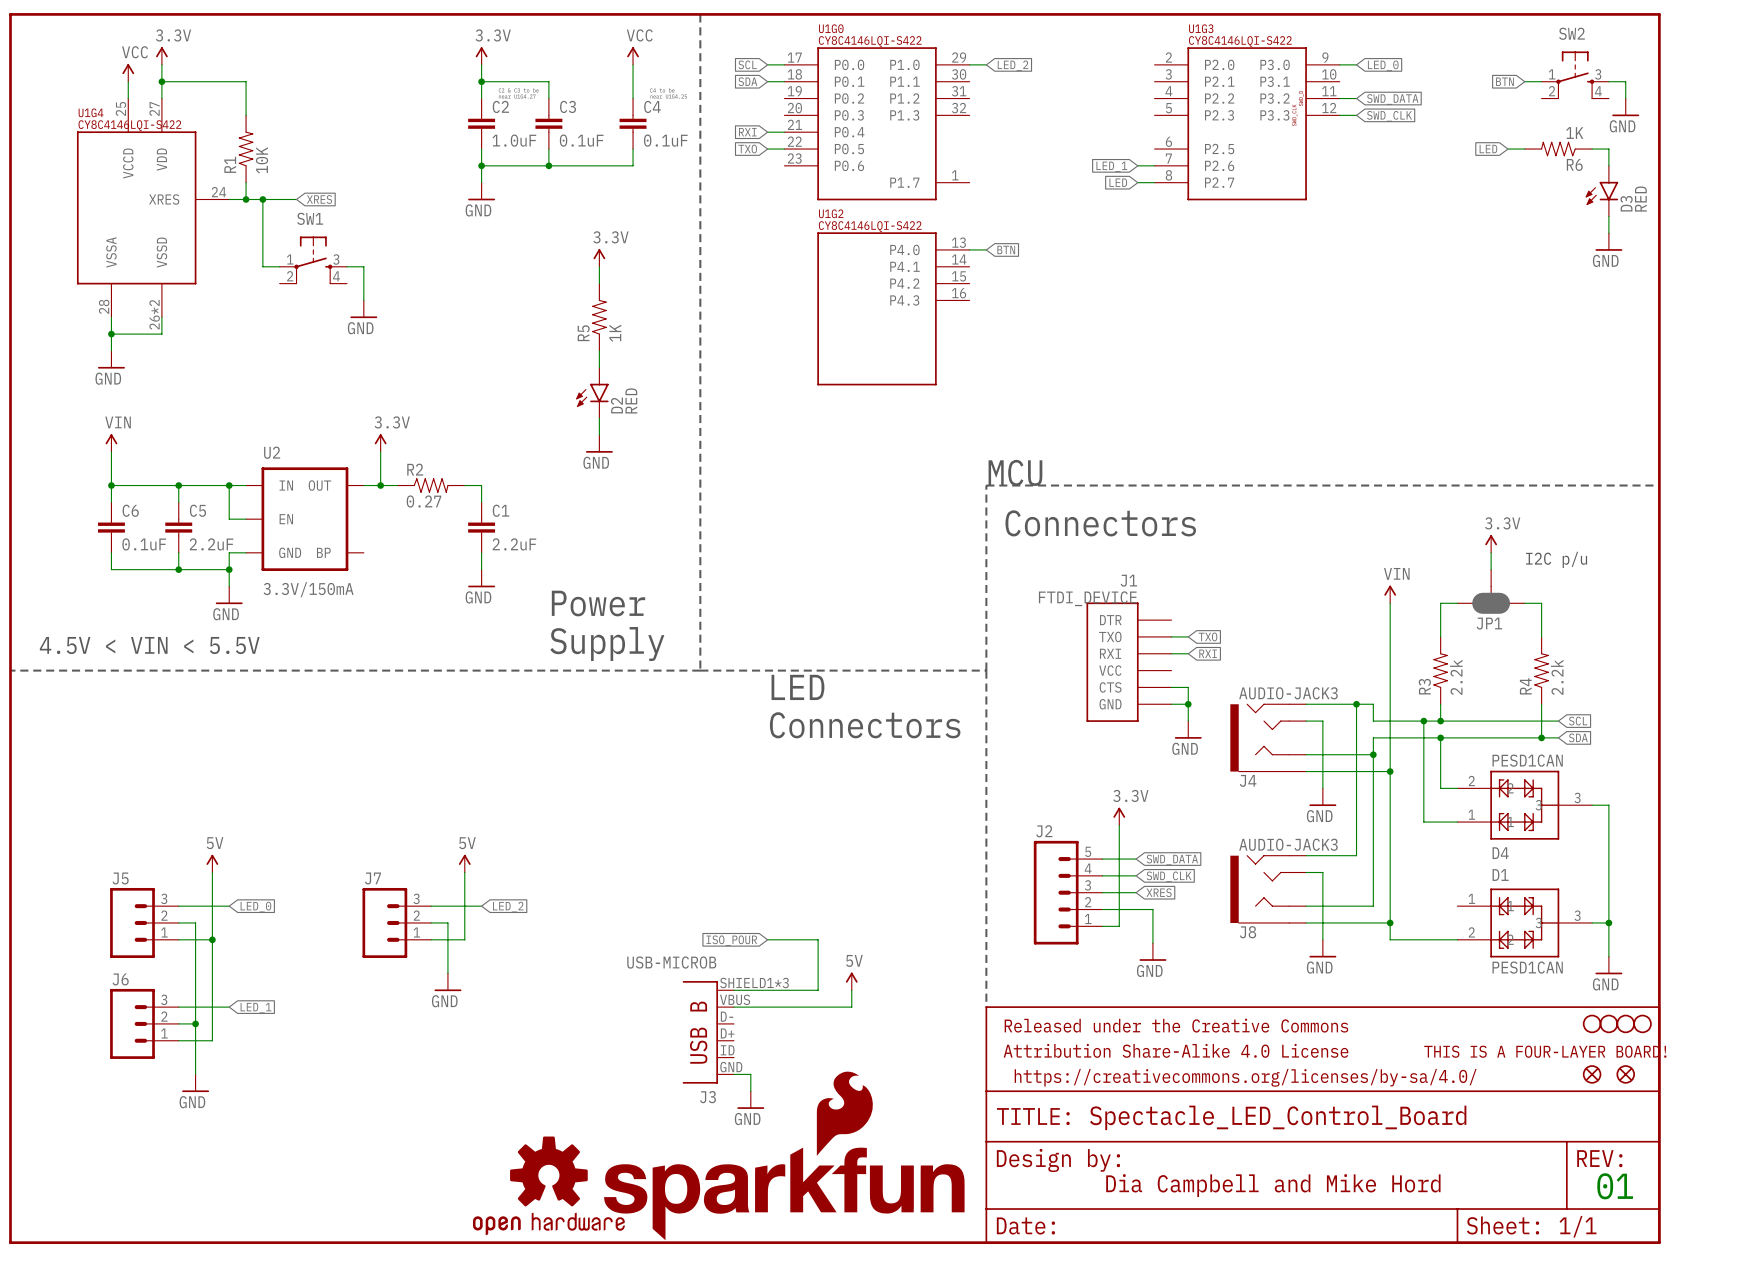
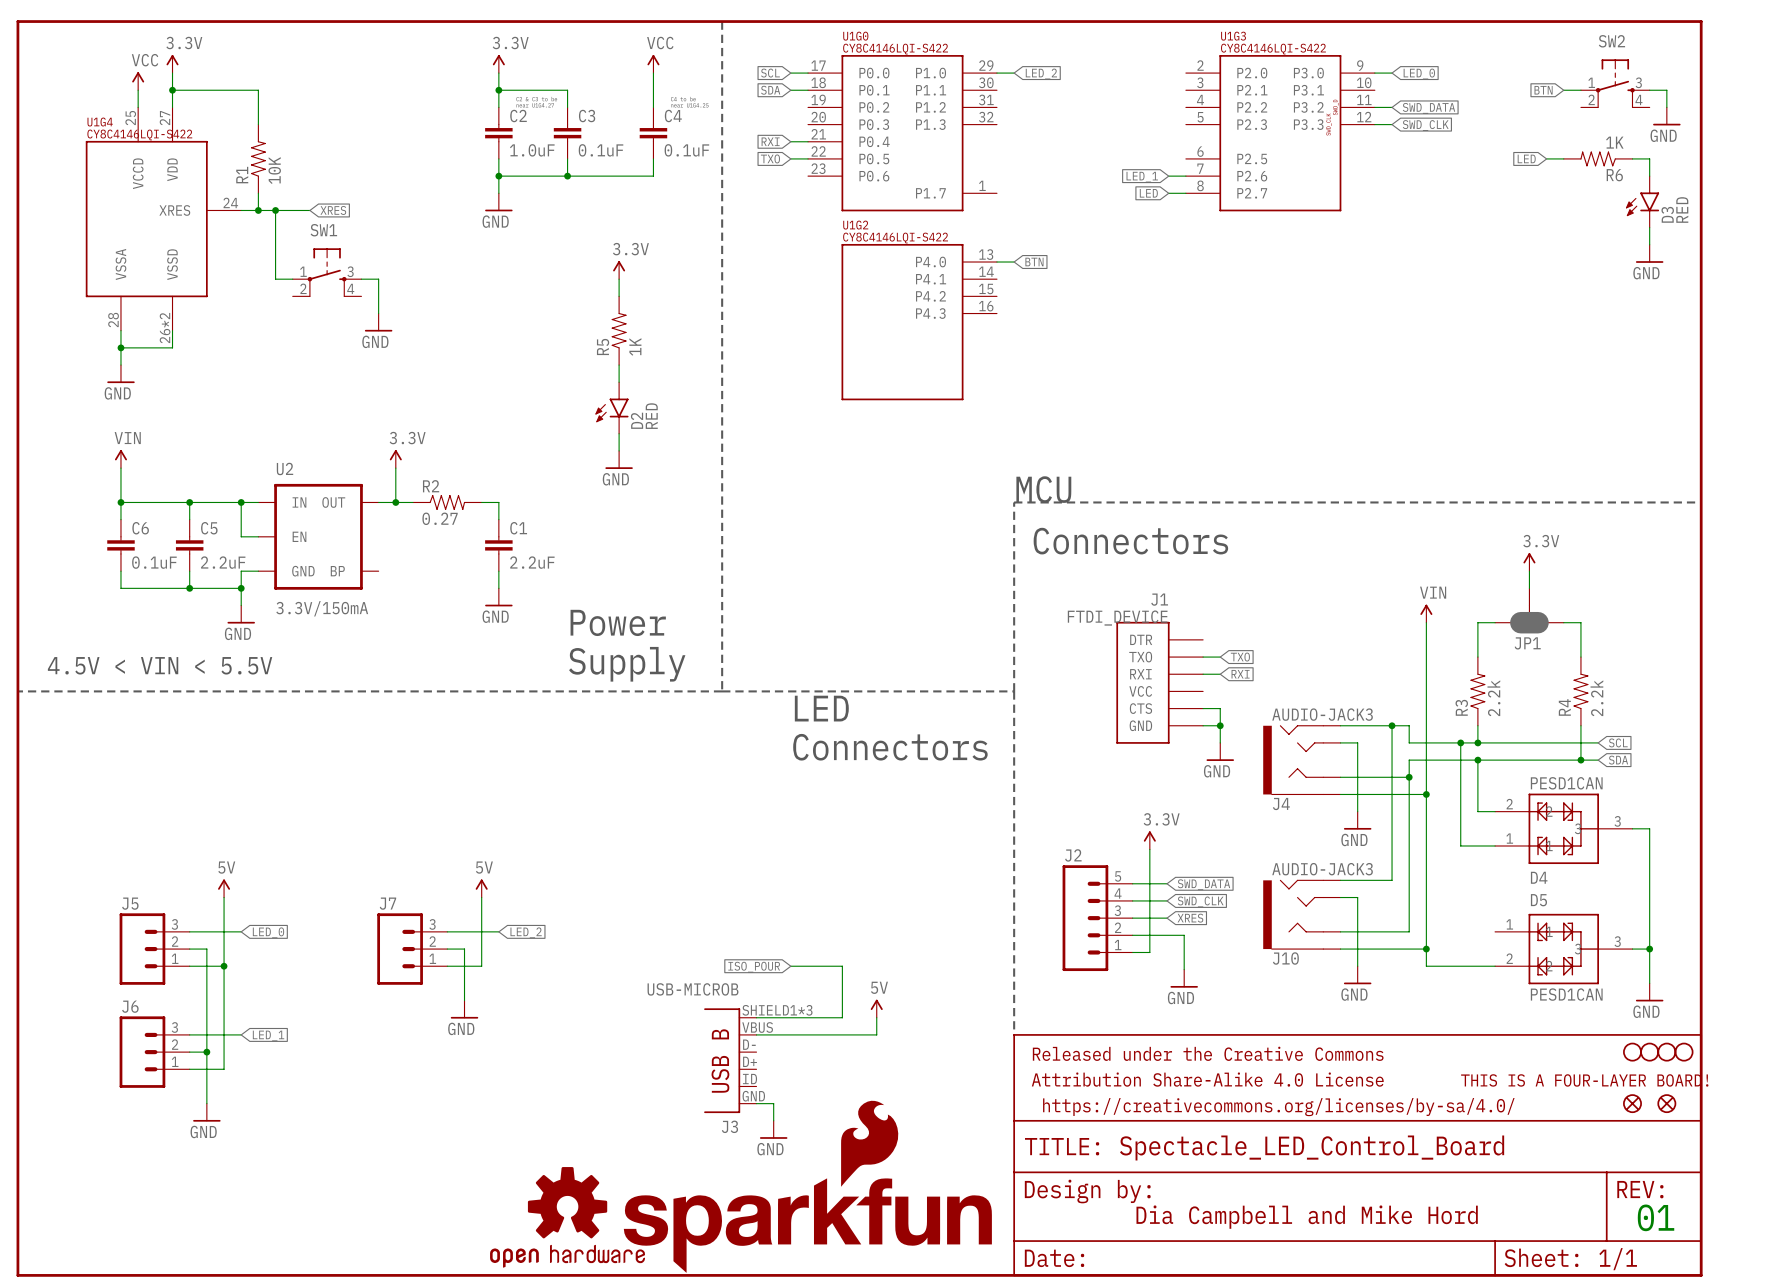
text: I2C p/u (1556, 559) -> none
D1 name: D1 (1500, 875) -> D5 (1538, 900)
J8 name: J8 (1248, 932) -> J10 (1285, 958)

